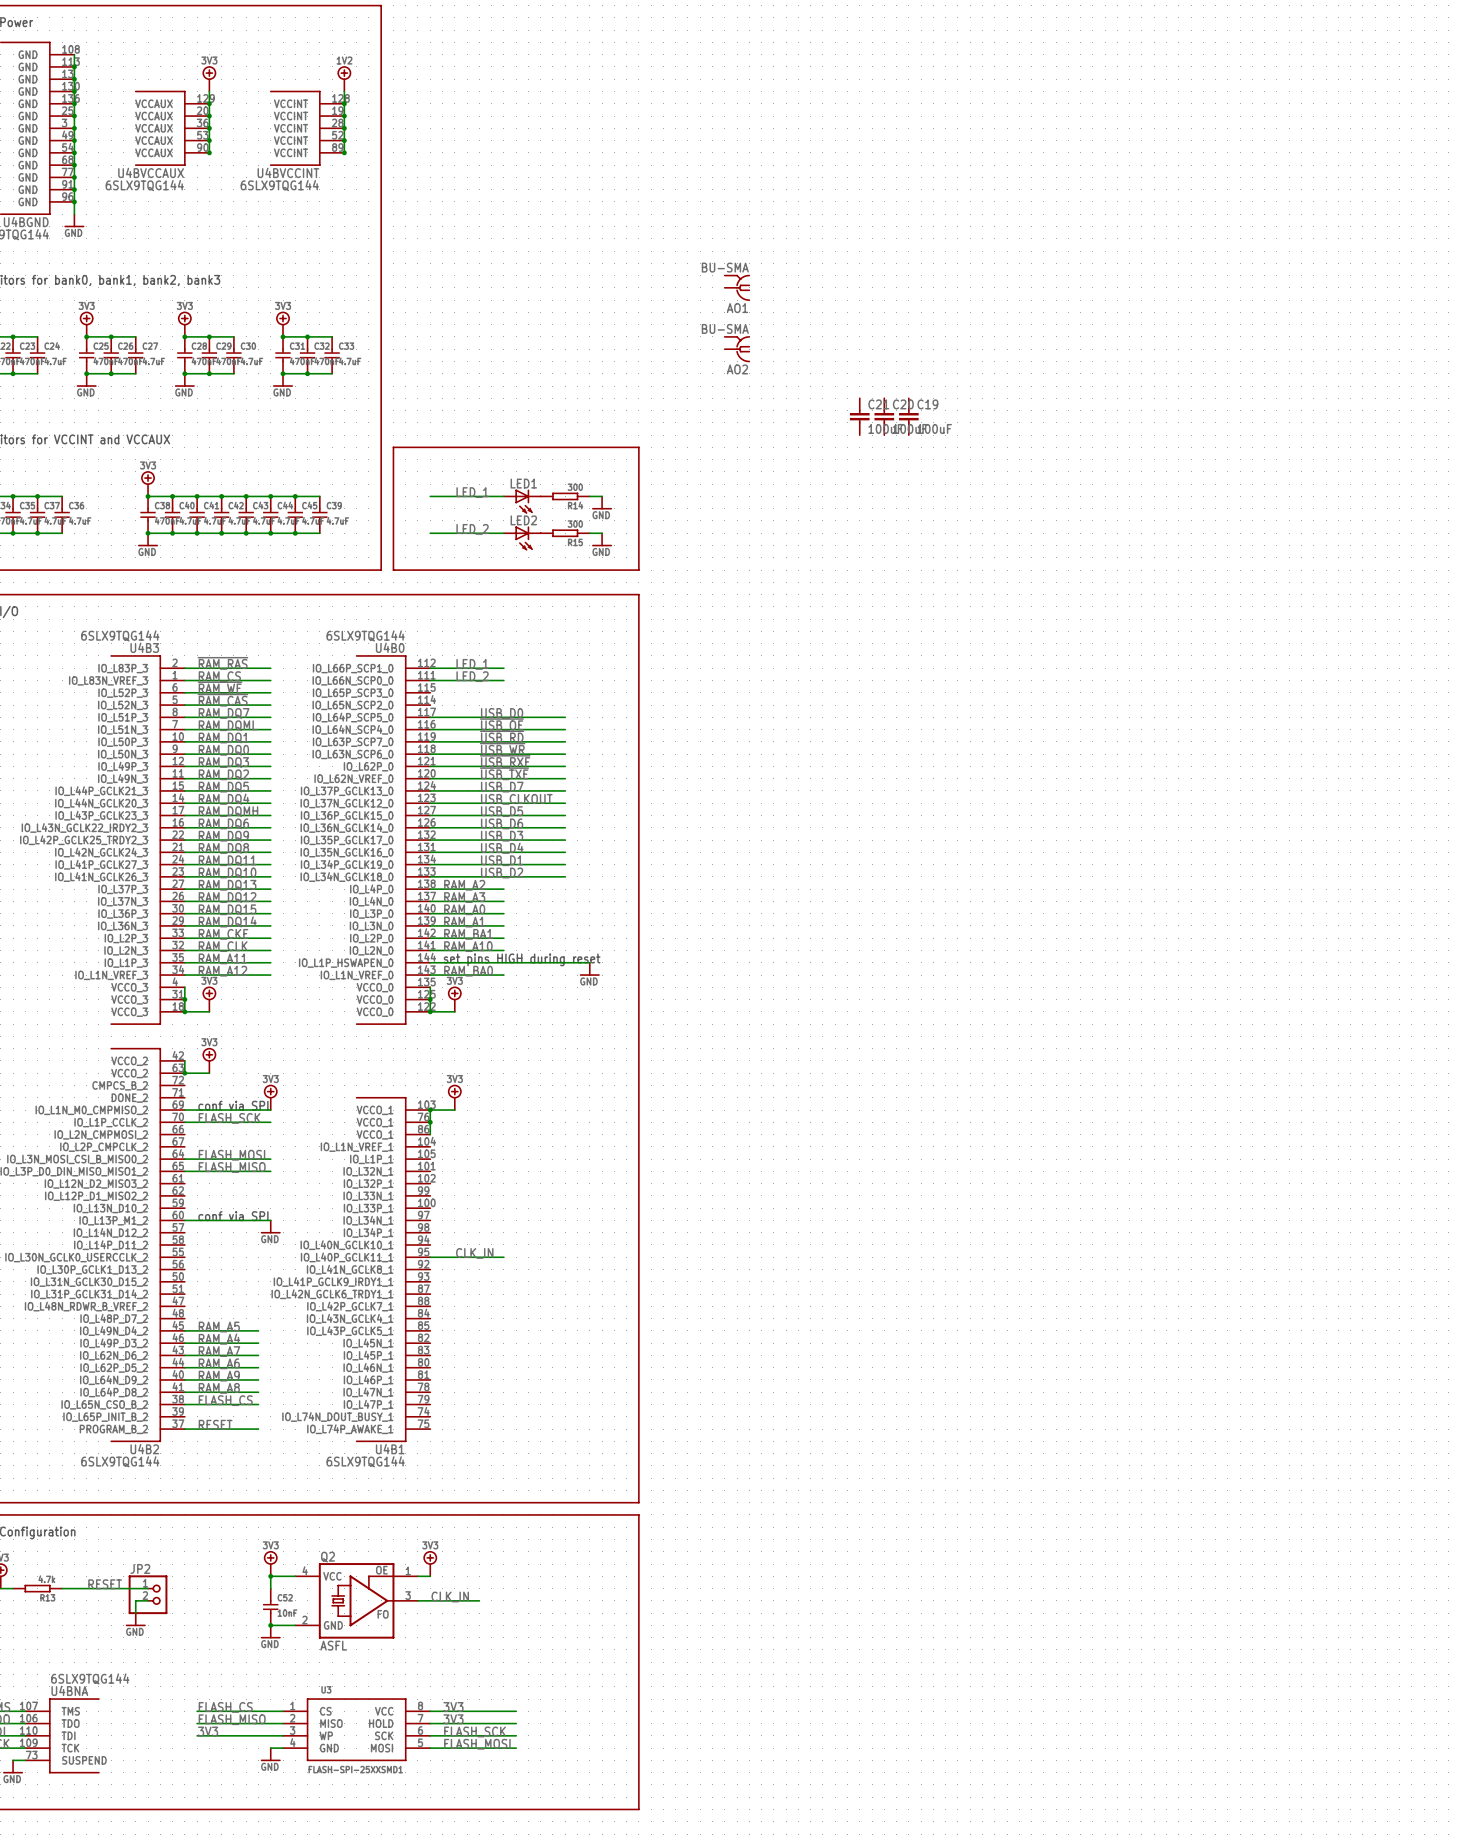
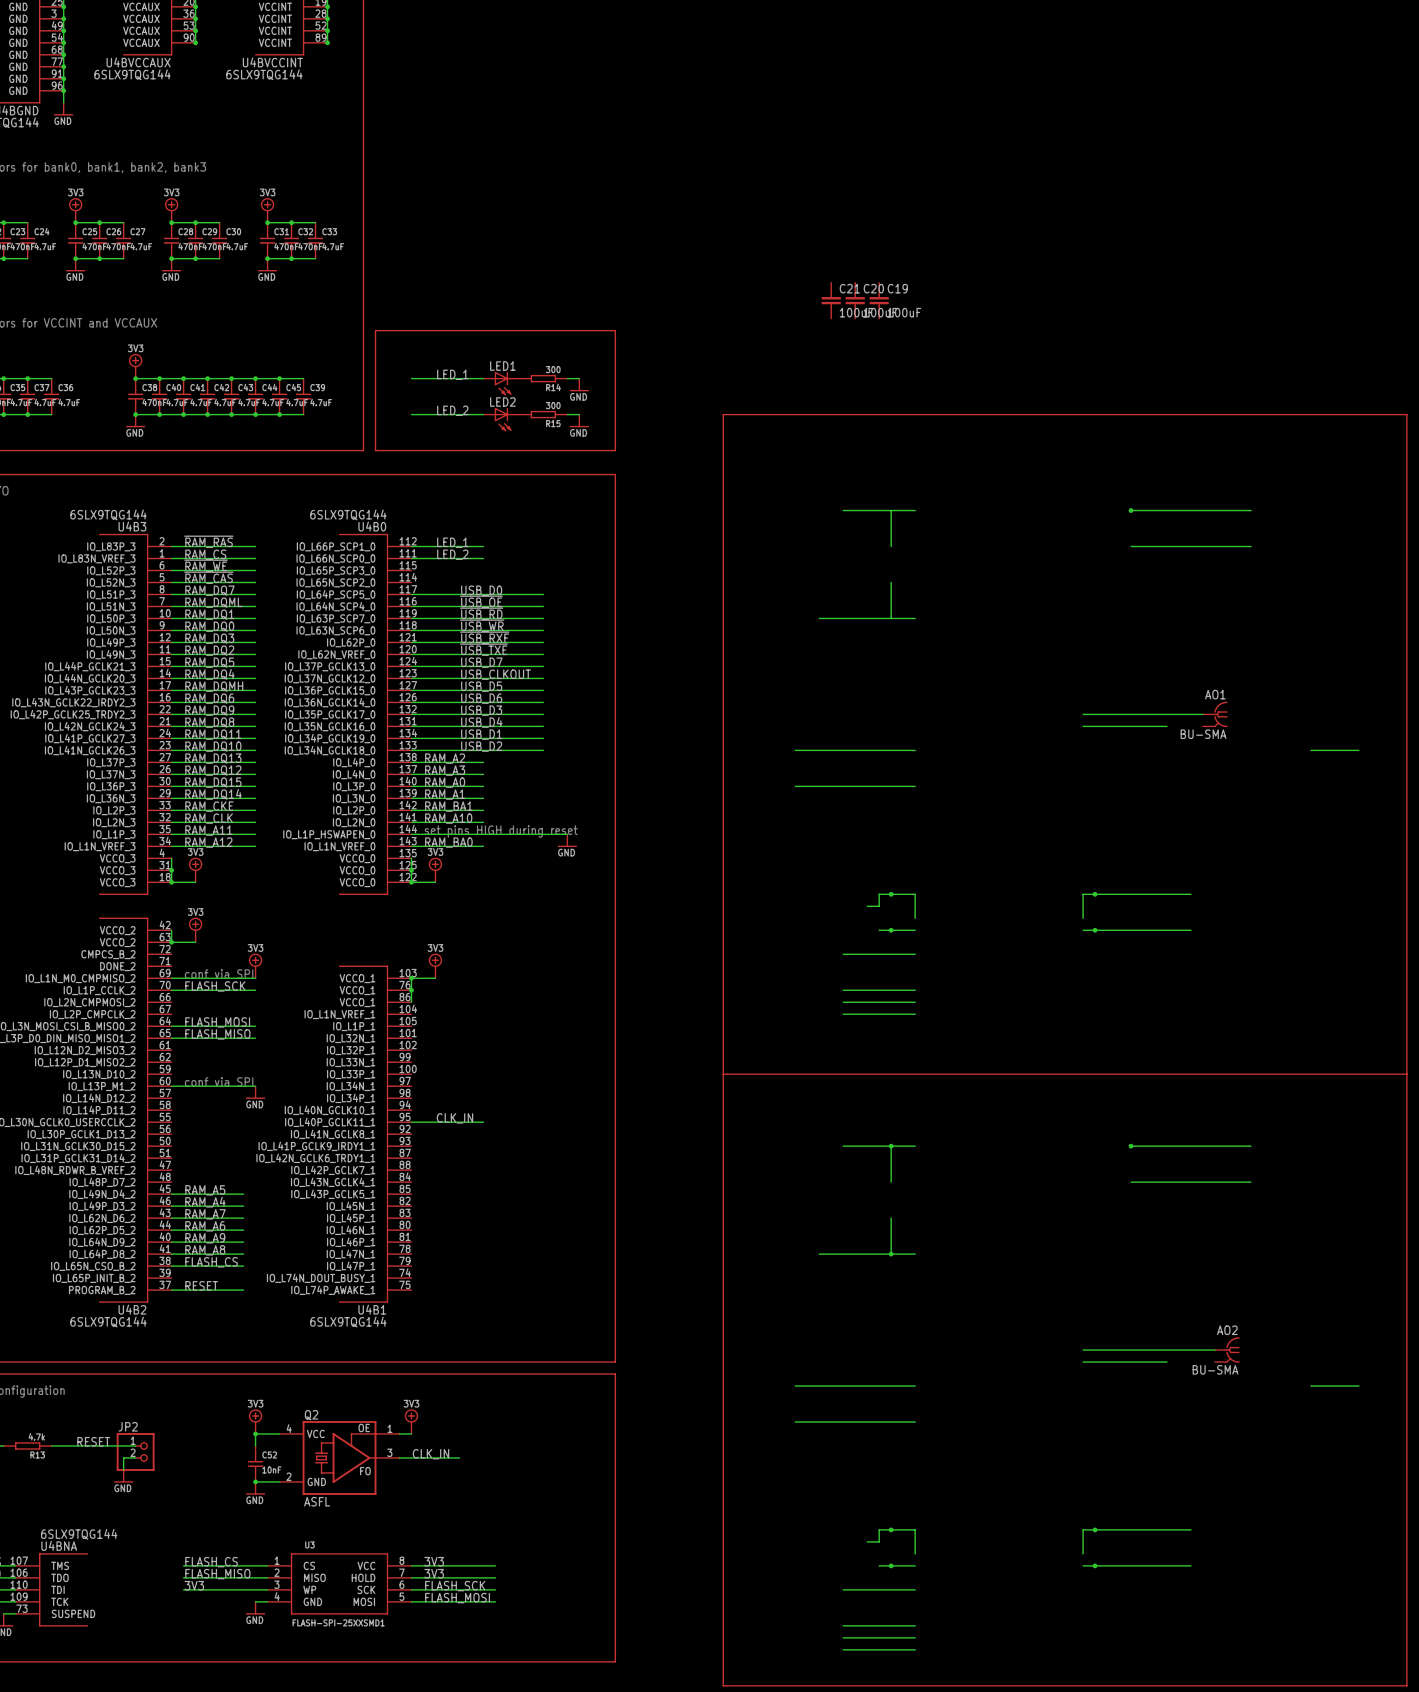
AO1 position: (737, 287) -> (1215, 714)
AO1 flip: as is (743, 287) -> up-down (1220, 714)
AO2 position: (737, 349) -> (1227, 1350)
AO2 flip: as is (743, 349) -> up-down (1232, 1350)
line: none -> (723, 414) (1406, 414) (1406, 1685) (723, 1685) (723, 414)
wire: none -> (843, 510) (915, 510)
wire: none -> (891, 510) (891, 546)
wire: none -> (1131, 510) (1250, 510)
junction: none -> (1131, 510)
wire: none -> (1131, 546) (1250, 546)
wire: none -> (891, 582) (891, 618)
wire: none -> (819, 618) (915, 618)
wire: none -> (1083, 714) (1203, 714)
wire: none -> (1083, 726) (1167, 726)
wire: none -> (795, 750) (915, 750)
wire: none -> (1310, 750) (1358, 750)
wire: none -> (795, 786) (915, 786)
junction: none -> (891, 894)
junction: none -> (1095, 894)
wire: none -> (1191, 894) (1083, 894) (1083, 918)
wire: none -> (867, 906) (879, 906) (879, 894) (915, 894) (915, 918)
wire: none -> (879, 930) (915, 930)
junction: none -> (891, 930)
wire: none -> (1083, 930) (1191, 930)
junction: none -> (1095, 930)
wire: none -> (843, 954) (915, 954)
wire: none -> (843, 990) (915, 990)
wire: none -> (843, 1002) (915, 1002)
wire: none -> (843, 1014) (915, 1014)
line: none -> (723, 1074) (1406, 1074)
wire: none -> (843, 1146) (915, 1146)
wire: none -> (891, 1146) (891, 1182)
junction: none -> (891, 1146)
wire: none -> (1131, 1146) (1250, 1146)
junction: none -> (1131, 1146)
wire: none -> (1131, 1182) (1250, 1182)
wire: none -> (891, 1218) (891, 1254)
wire: none -> (819, 1254) (915, 1254)
junction: none -> (891, 1254)
wire: none -> (1083, 1350) (1214, 1350)
wire: none -> (1083, 1362) (1167, 1362)
wire: none -> (795, 1386) (915, 1386)
wire: none -> (1310, 1386) (1358, 1386)
wire: none -> (795, 1421) (915, 1421)
junction: none -> (891, 1529)
junction: none -> (1095, 1529)
wire: none -> (1191, 1529) (1083, 1529) (1083, 1553)
wire: none -> (867, 1541) (879, 1541) (879, 1529) (915, 1529) (915, 1553)
wire: none -> (879, 1565) (915, 1565)
junction: none -> (891, 1565)
wire: none -> (1083, 1565) (1191, 1565)
junction: none -> (1095, 1565)
wire: none -> (843, 1589) (915, 1589)
wire: none -> (843, 1625) (915, 1625)
wire: none -> (843, 1637) (915, 1637)
wire: none -> (843, 1649) (915, 1649)

